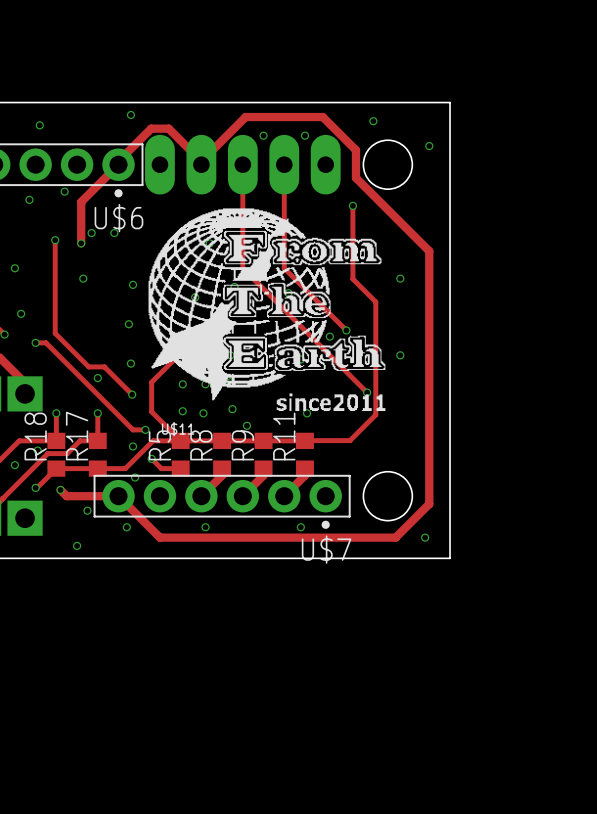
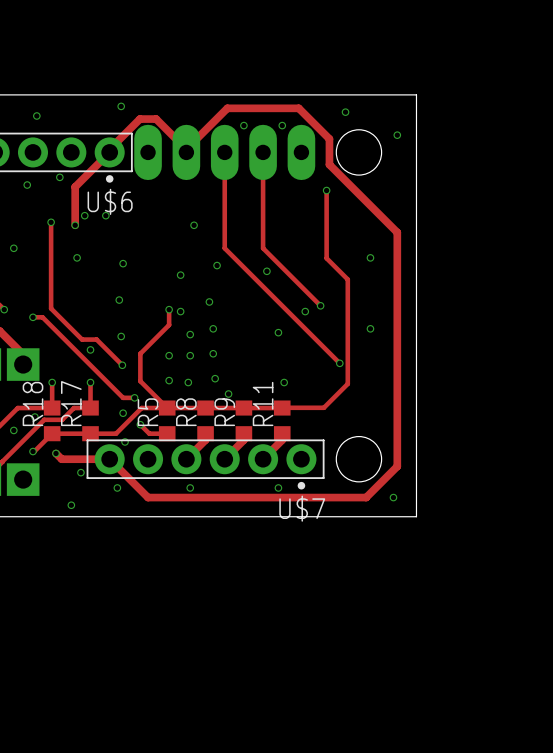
U$11: (266, 309) -> none
via: (21, 313) -> none

